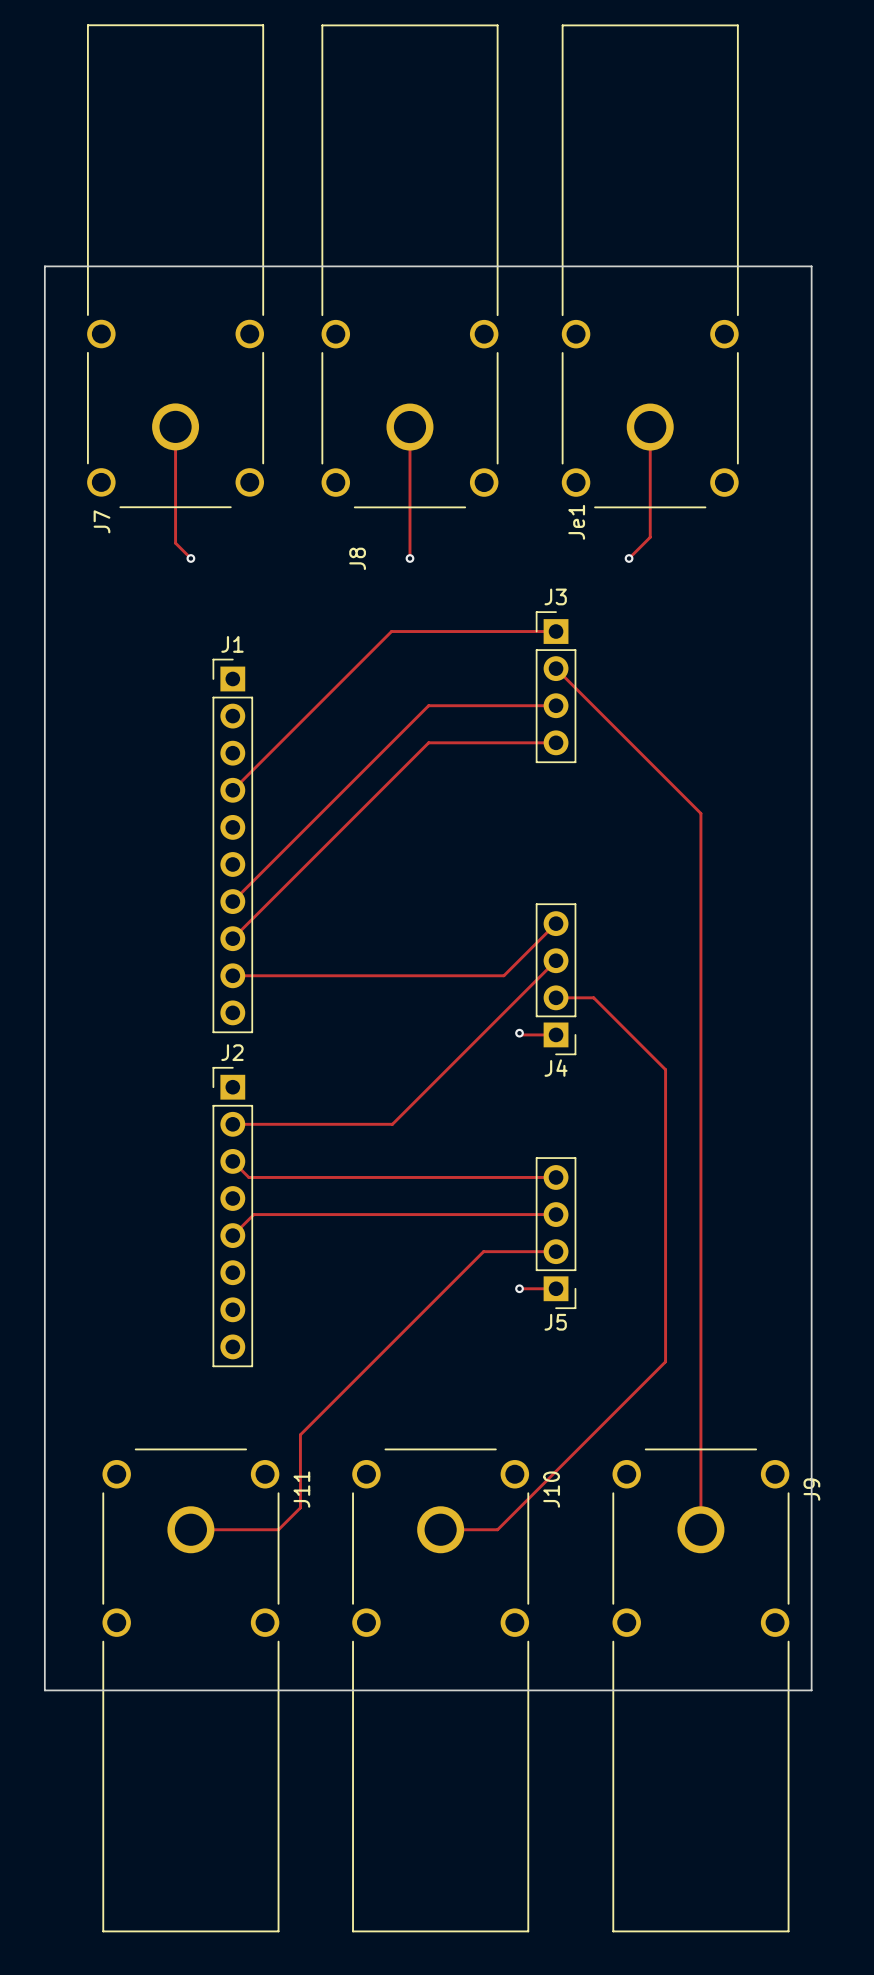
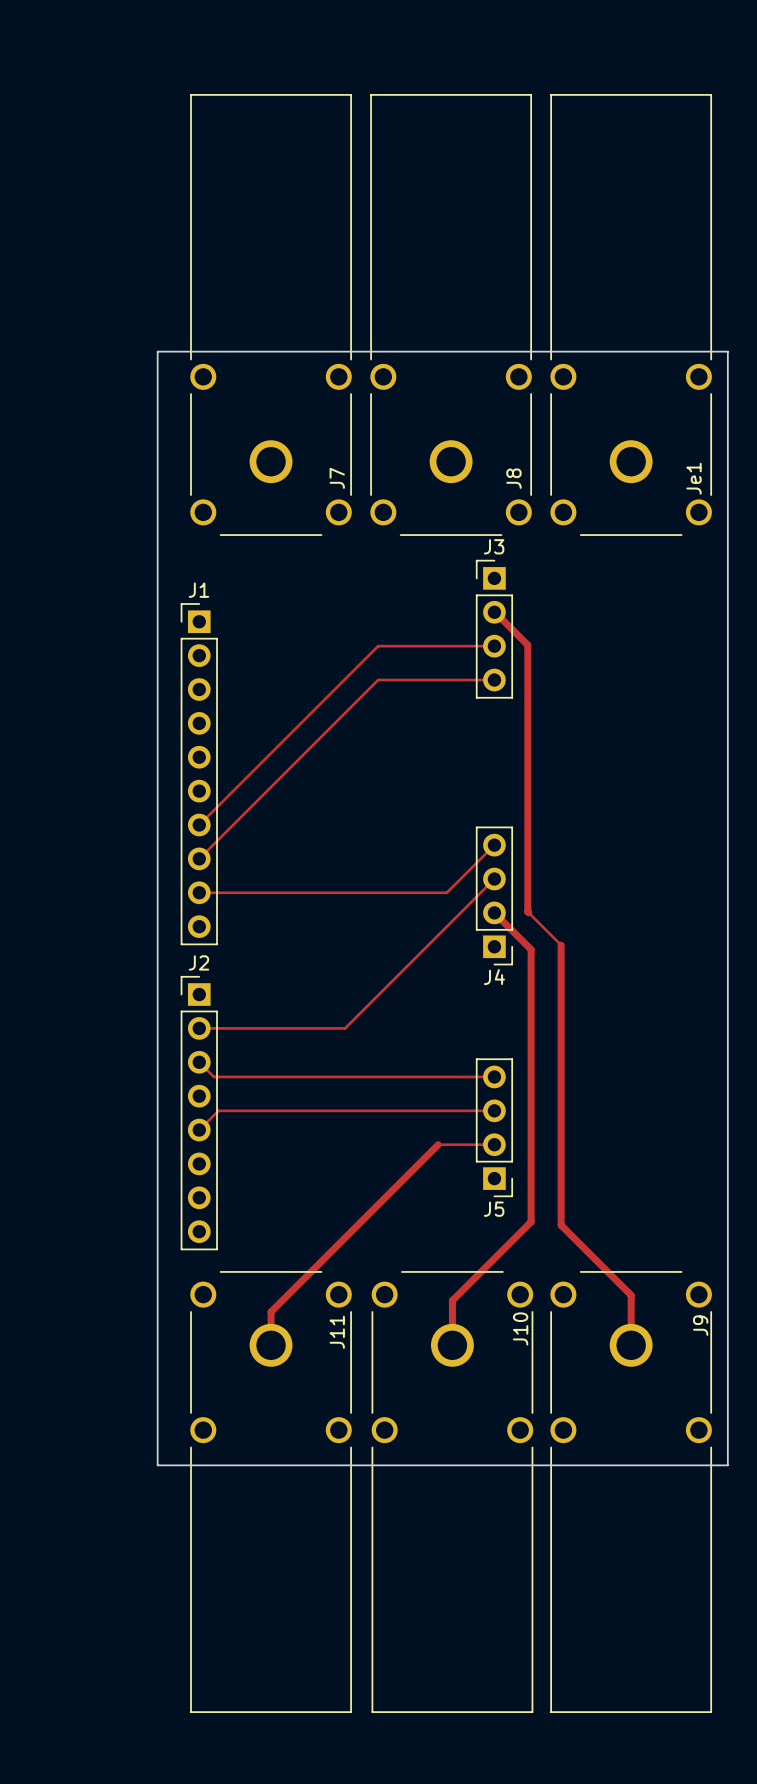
J7 position: (175, 266) -> (271, 314)
J8 position: (409, 266) -> (451, 314)
Je1 position: (650, 266) -> (631, 314)
board edge: (811, 383) (811, 266) (44, 266) (44, 1690) (811, 1690) (811, 1602) -> (727, 351) (157, 351) (157, 1465) (727, 1465)
track: (175, 426) (175, 543) (190, 558) -> none
track: (409, 427) (409, 558) -> none
track: (650, 427) (650, 537) (629, 558) -> none
J7 name position: J7 (101, 521) -> J7 (337, 478)
Je1 name position: Je1 (576, 522) -> Je1 (694, 478)
via: (190, 558) -> none
J8 name position: J8 (357, 558) -> J8 (513, 478)
via: (409, 558) -> none
via: (629, 558) -> none
track: (556, 631) (391, 631) (232, 790) -> none
track: (556, 668) (700, 813) (700, 1529) -> none
track: (556, 997) (593, 997) -> (494, 611) (527, 645) (528, 912)
track: none -> (494, 912) (531, 949) (531, 1221) (452, 1300) (452, 1345)
track: (519, 1033) (521, 1034) (556, 1034) -> none
via: (519, 1033) -> none
track: (629, 1033) (665, 1069) (665, 1361) (497, 1529) (440, 1529) -> (561, 945) (561, 1225) (631, 1295) (631, 1345)
track: (494, 1251) (483, 1251) (300, 1434) (300, 1507) (278, 1529) (190, 1529) -> (438, 1144) (271, 1311) (271, 1345)
track: (519, 1288) (556, 1288) -> none
via: (519, 1288) -> none
J11 name position: J11 (301, 1489) -> J11 (337, 1332)
J10 name position: J10 (551, 1489) -> J10 (520, 1328)
J9 name position: J9 (811, 1489) -> J9 (700, 1325)
J11 position: (190, 1690) -> (271, 1492)
J10 position: (440, 1690) -> (452, 1492)
J9 position: (700, 1690) -> (631, 1492)

